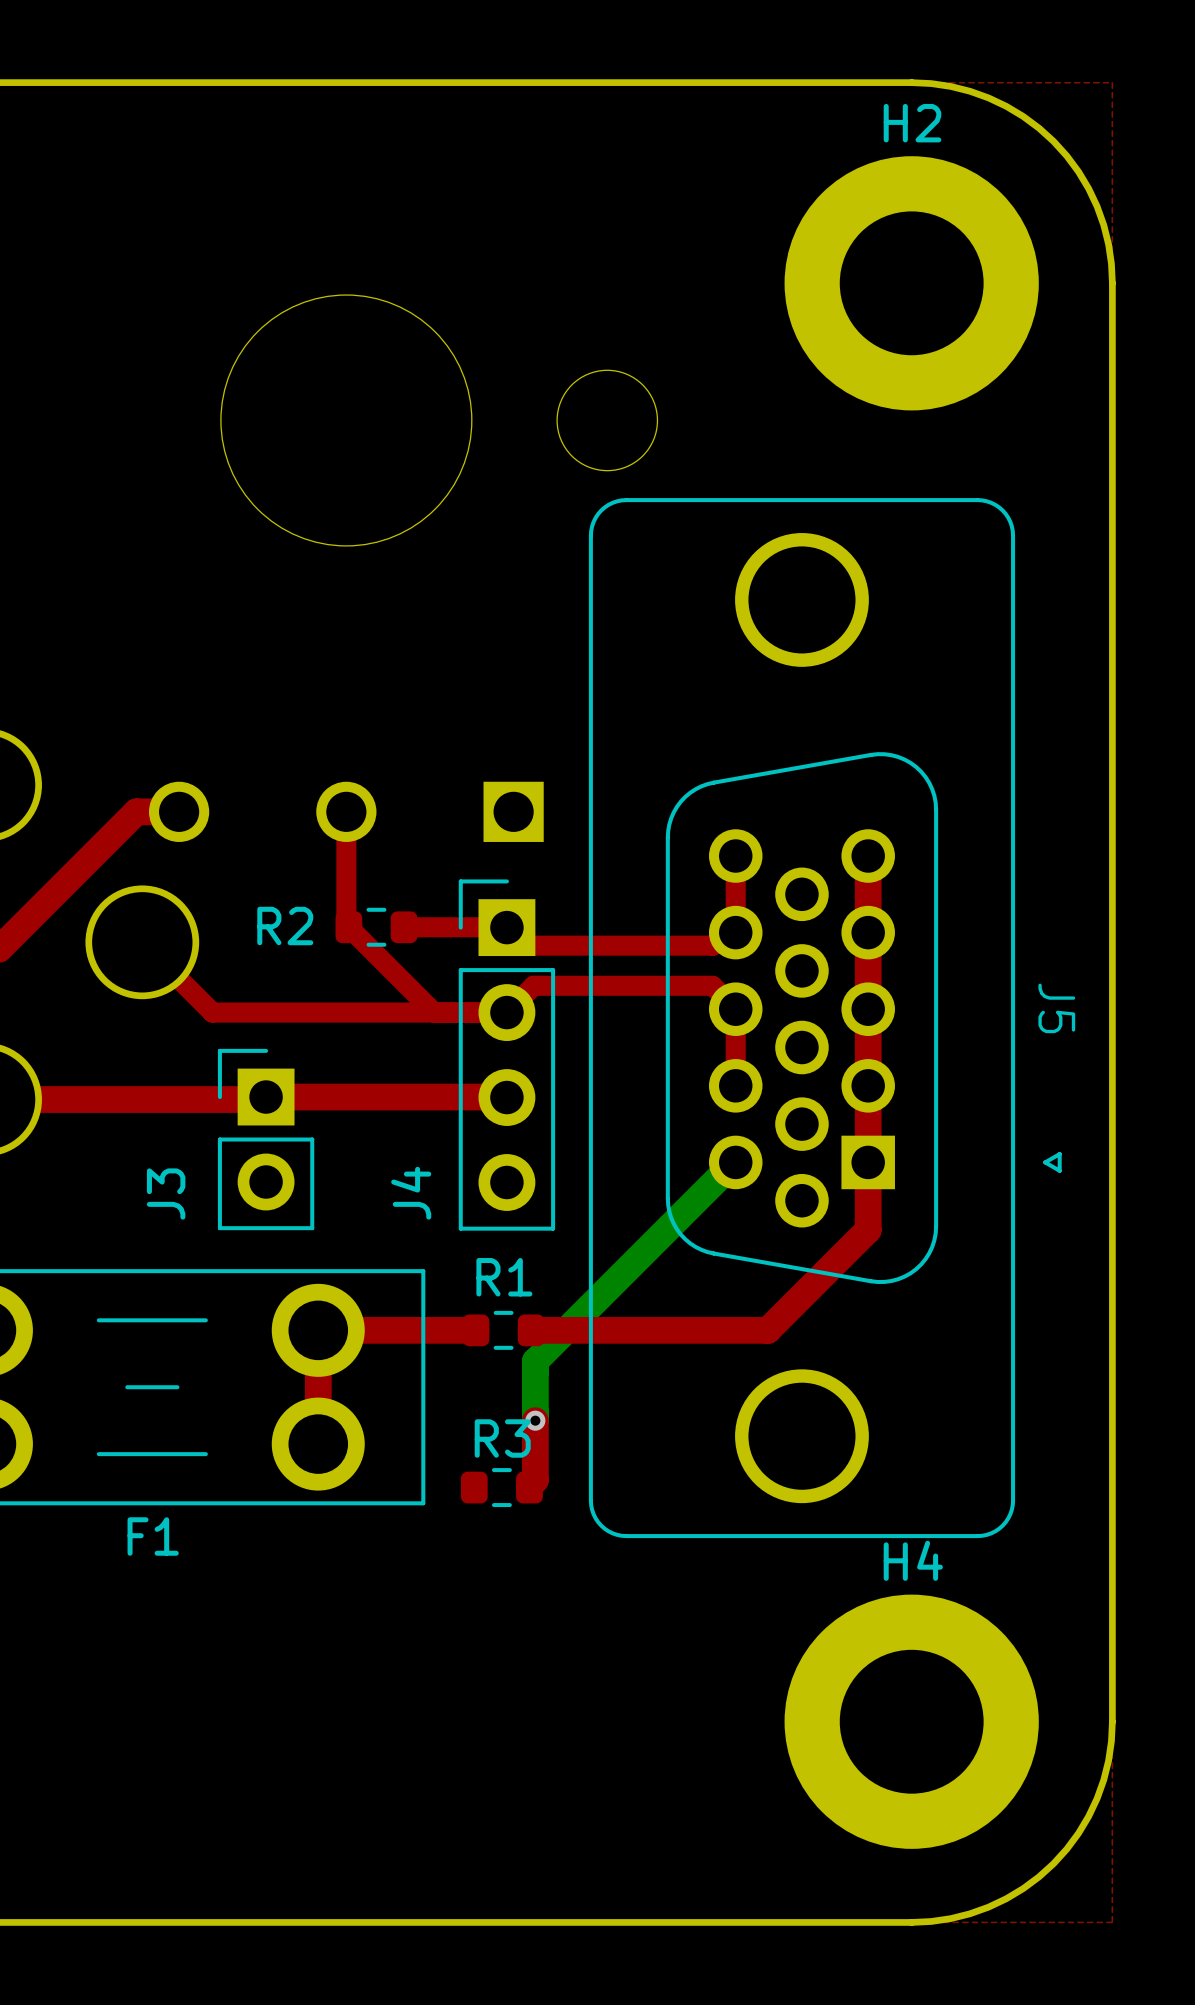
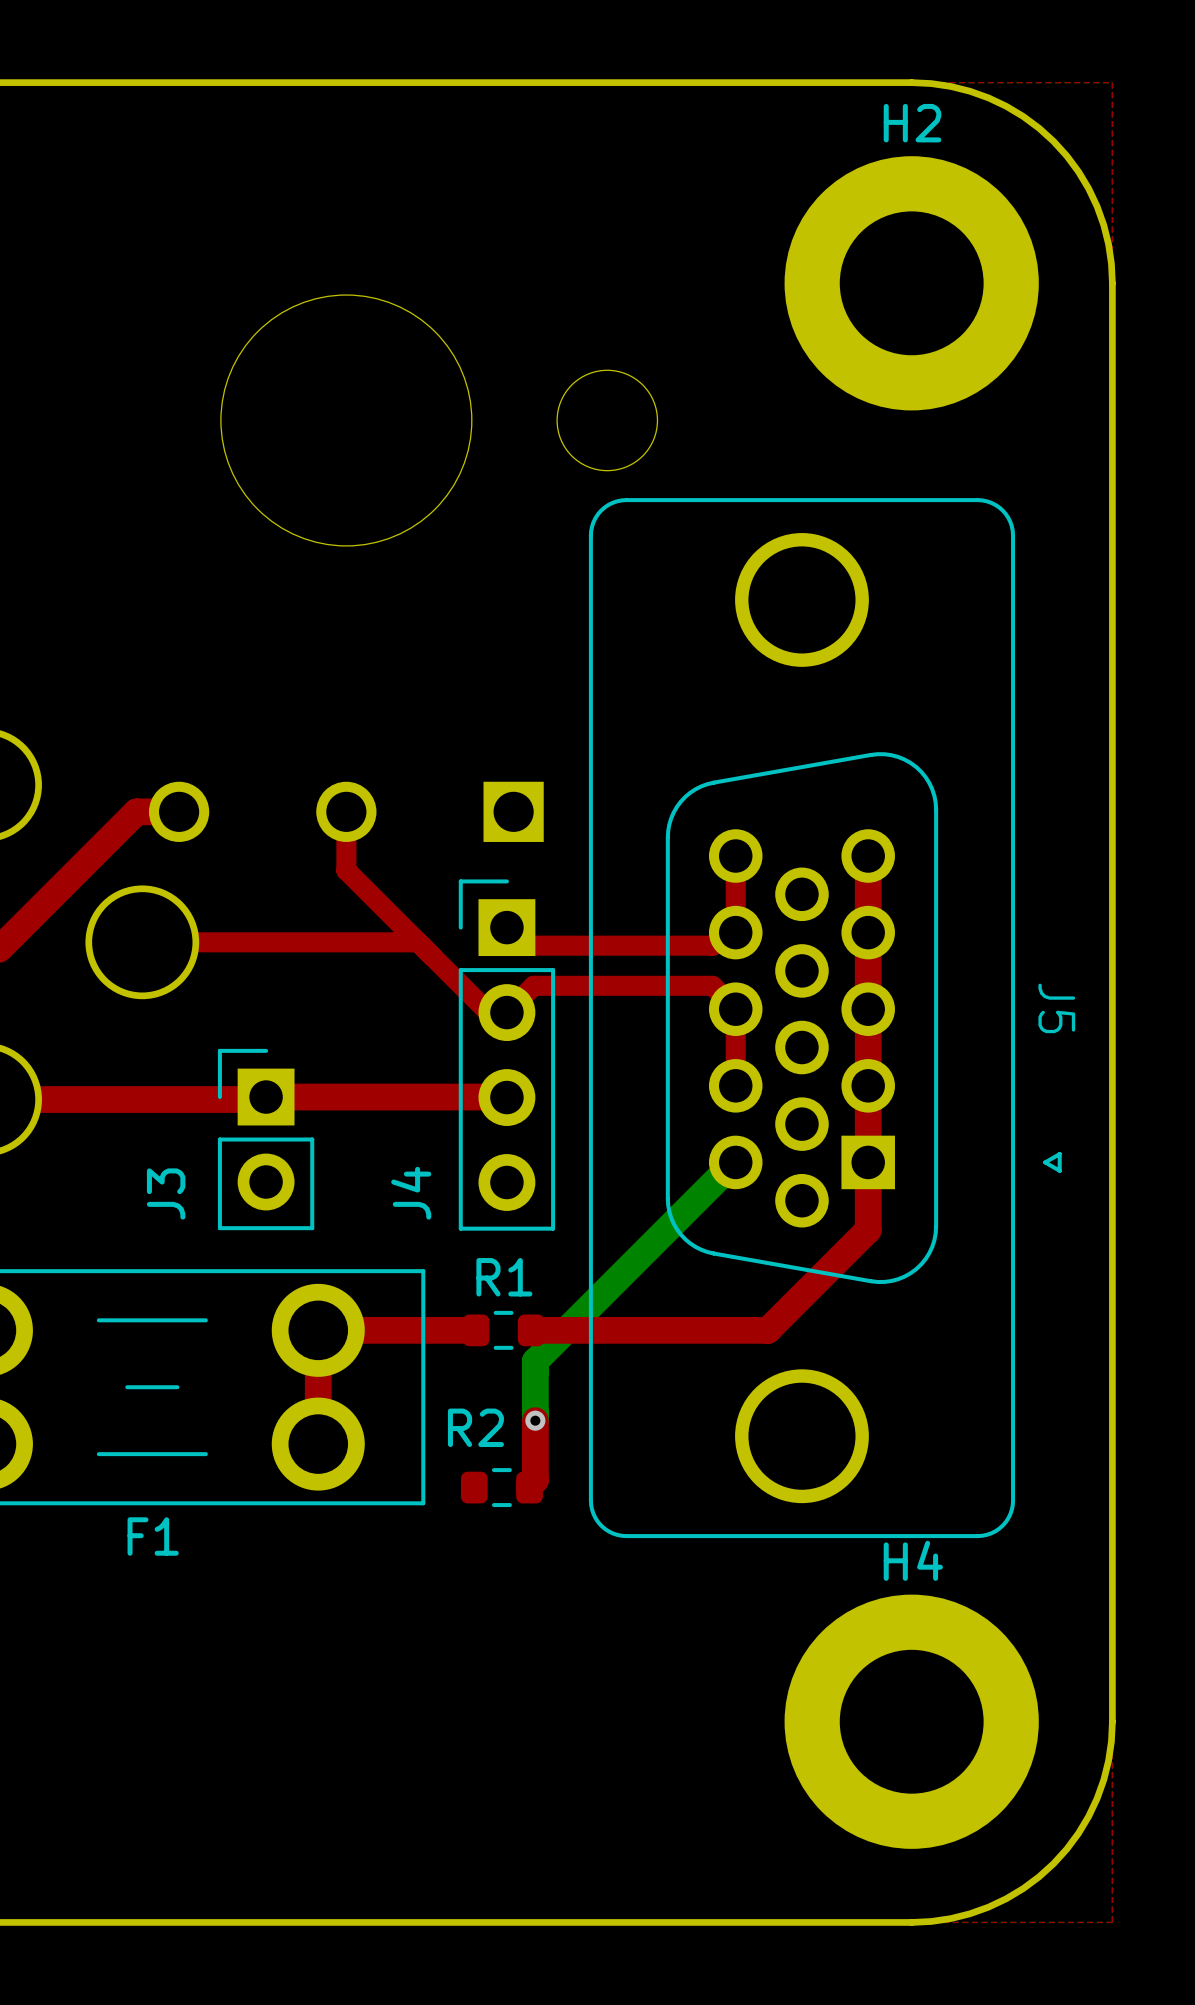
top track: (346, 870) (346, 924) (434, 1012) -> (346, 870) (488, 1012)
R2: (376, 927) -> none
top track: (404, 927) (506, 927) -> none
top track: (142, 942) (212, 1012) (488, 1012) -> (142, 942) (418, 942)
R3 name: R3 (502, 1438) -> R2 (475, 1427)

